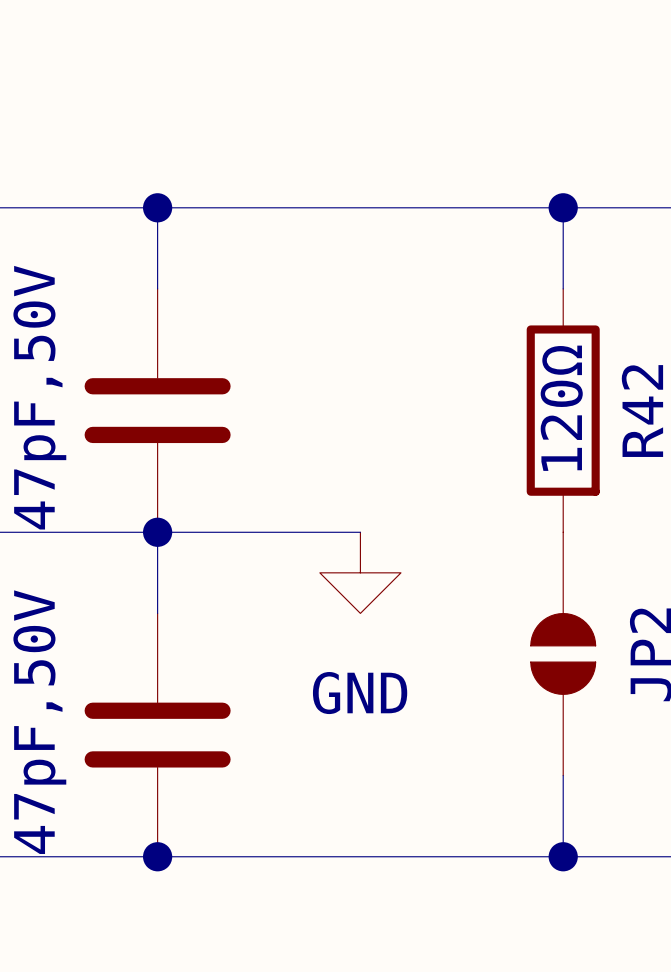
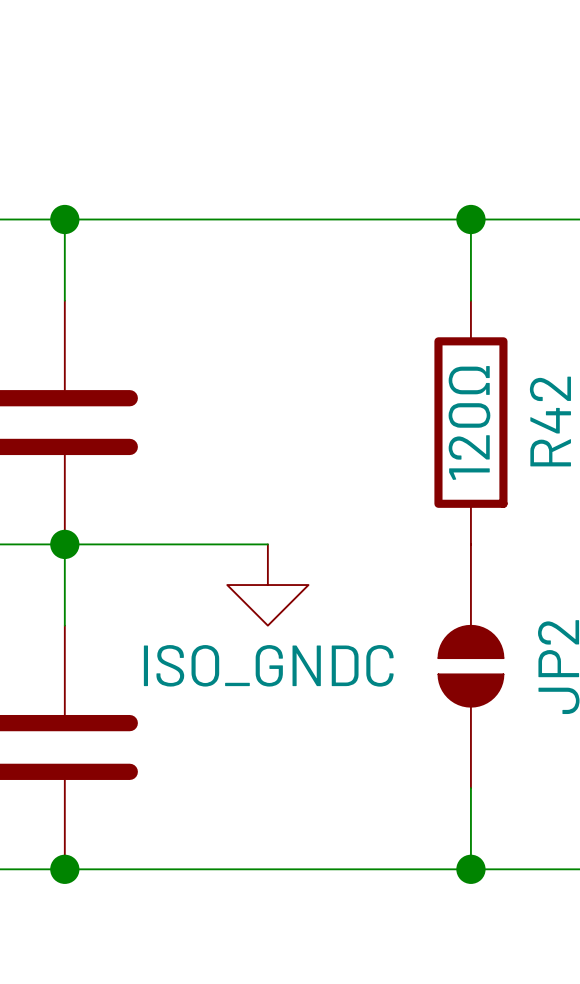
power symbol: GND (360, 572) -> ISO_GNDC (267, 585)

